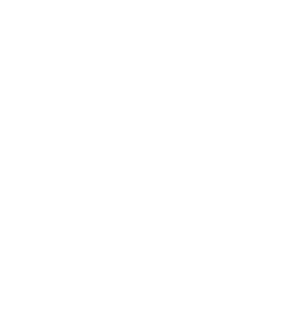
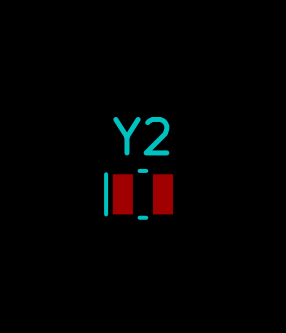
Y2: none -> (138, 194)

